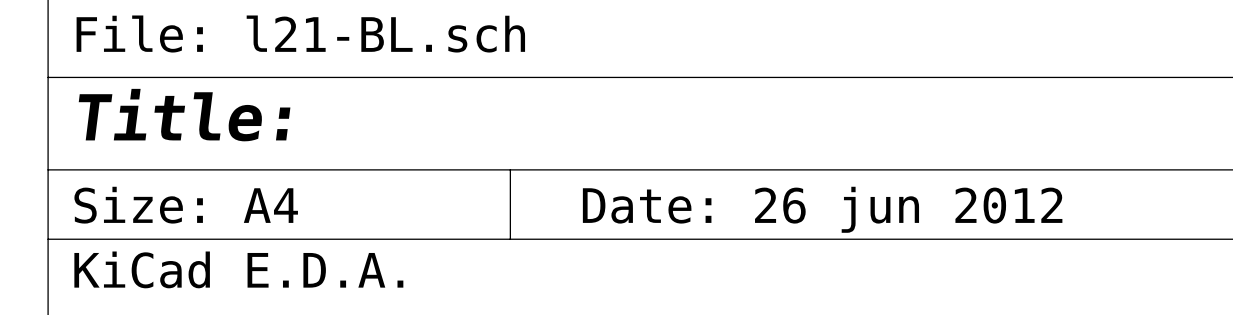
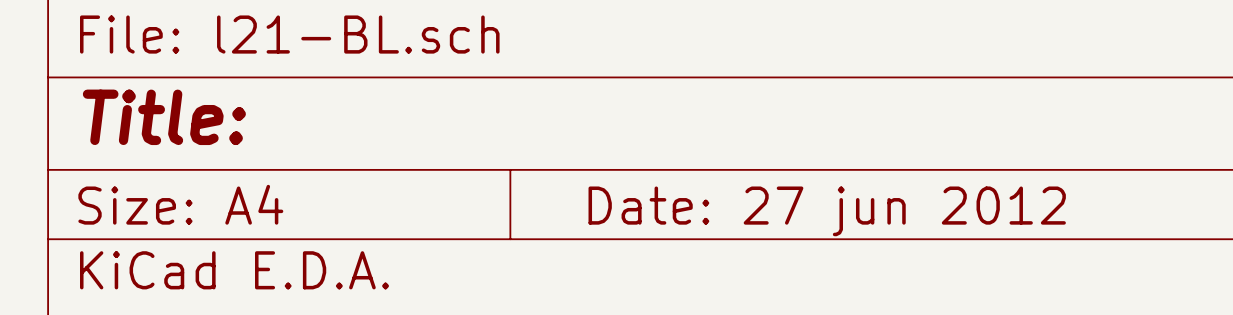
title block: Date: 26 jun 2012 (822, 209) -> Date: 27 jun 2012 (827, 211)

